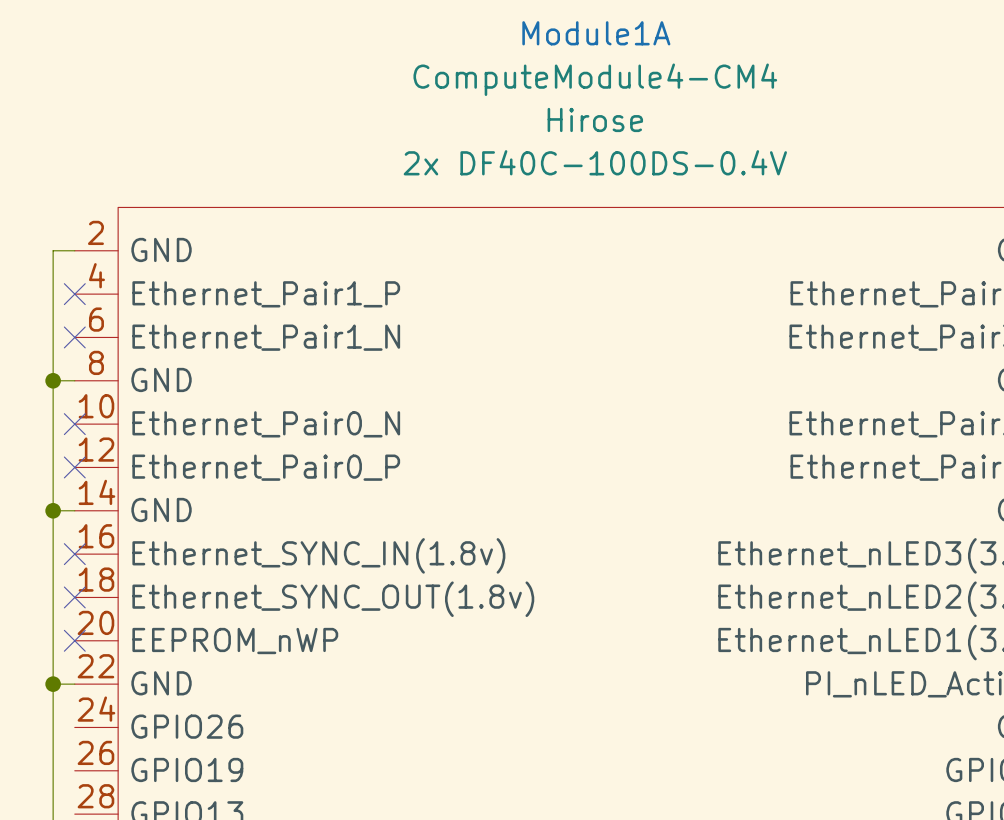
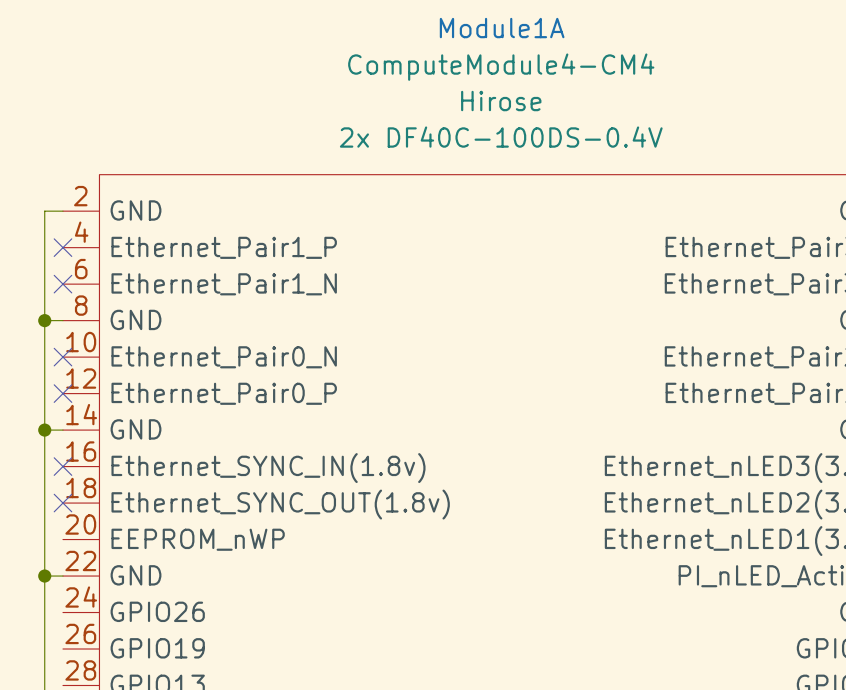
no-connect mark: (74, 640) -> none

